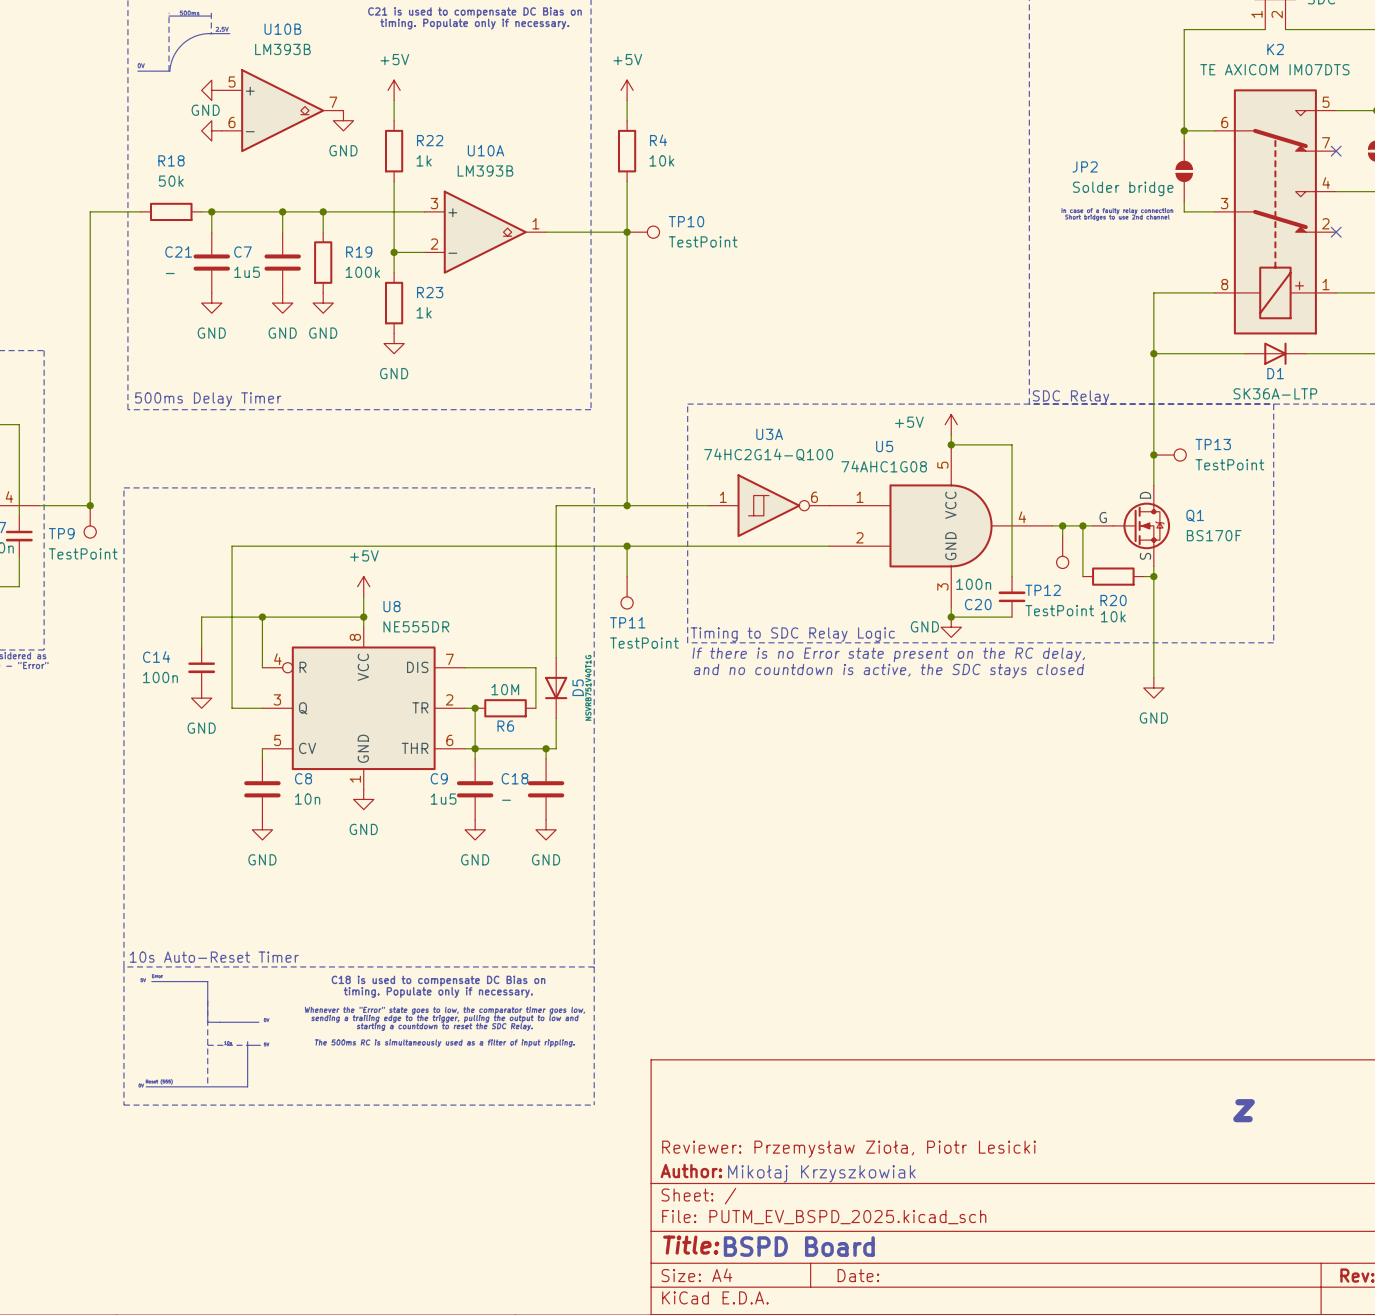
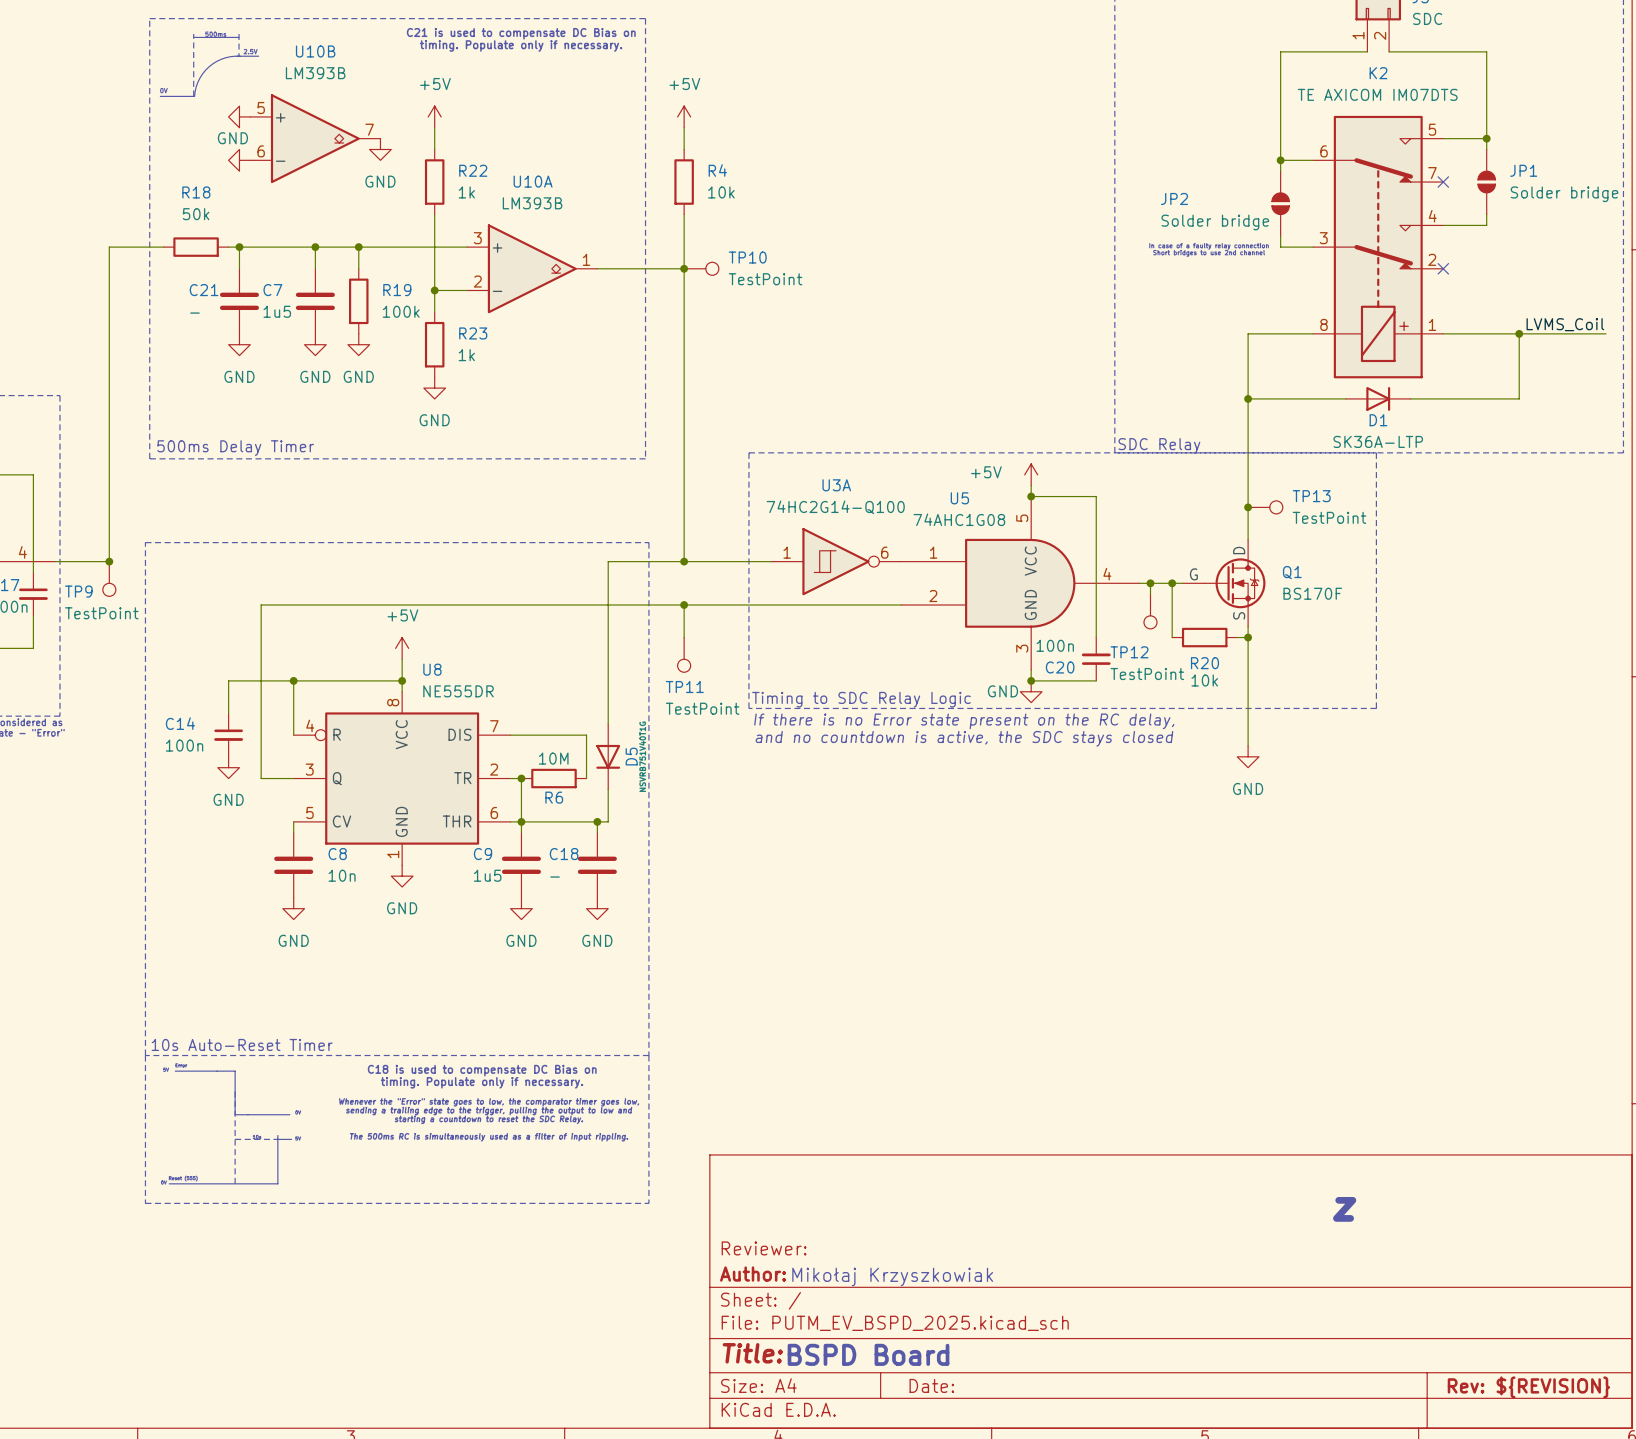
title block: Reviewer: Przemysław Zioła, Piotr Lesicki (849, 1149) -> Reviewer: (764, 1248)

